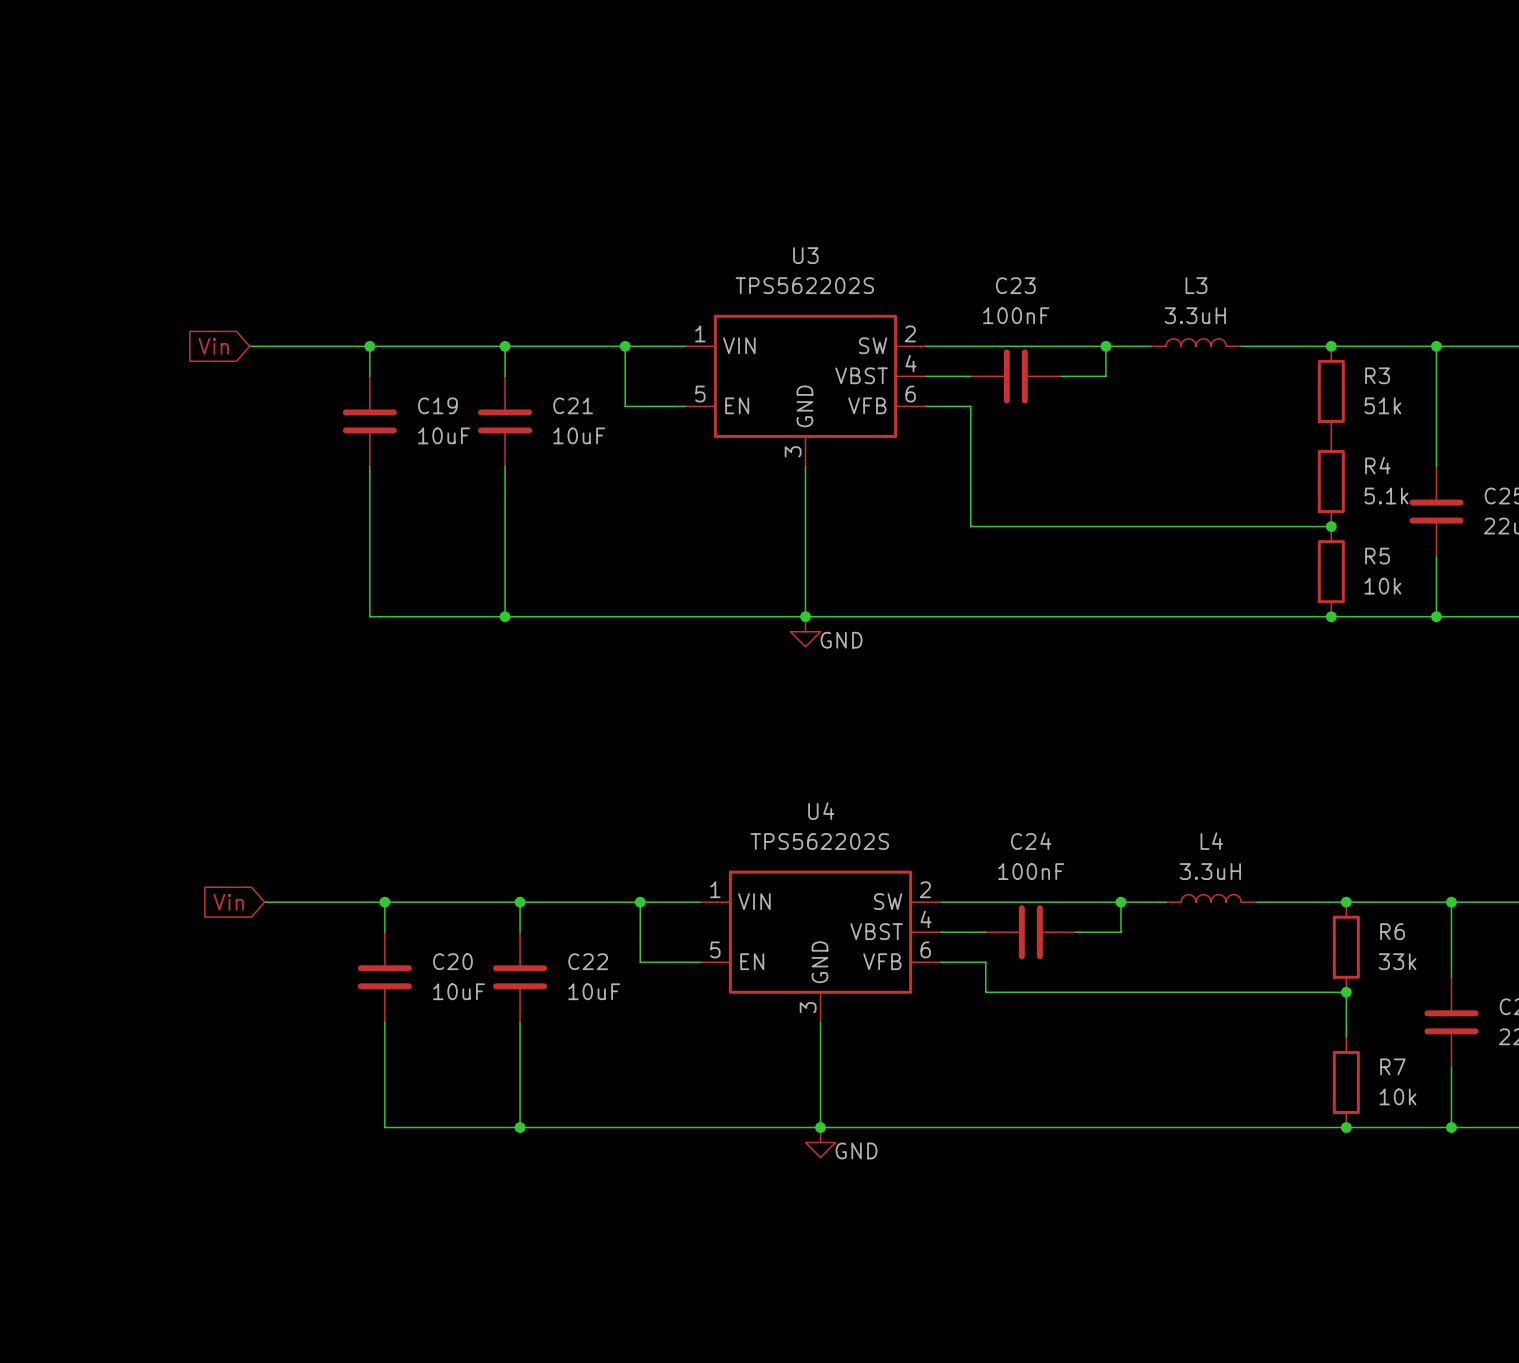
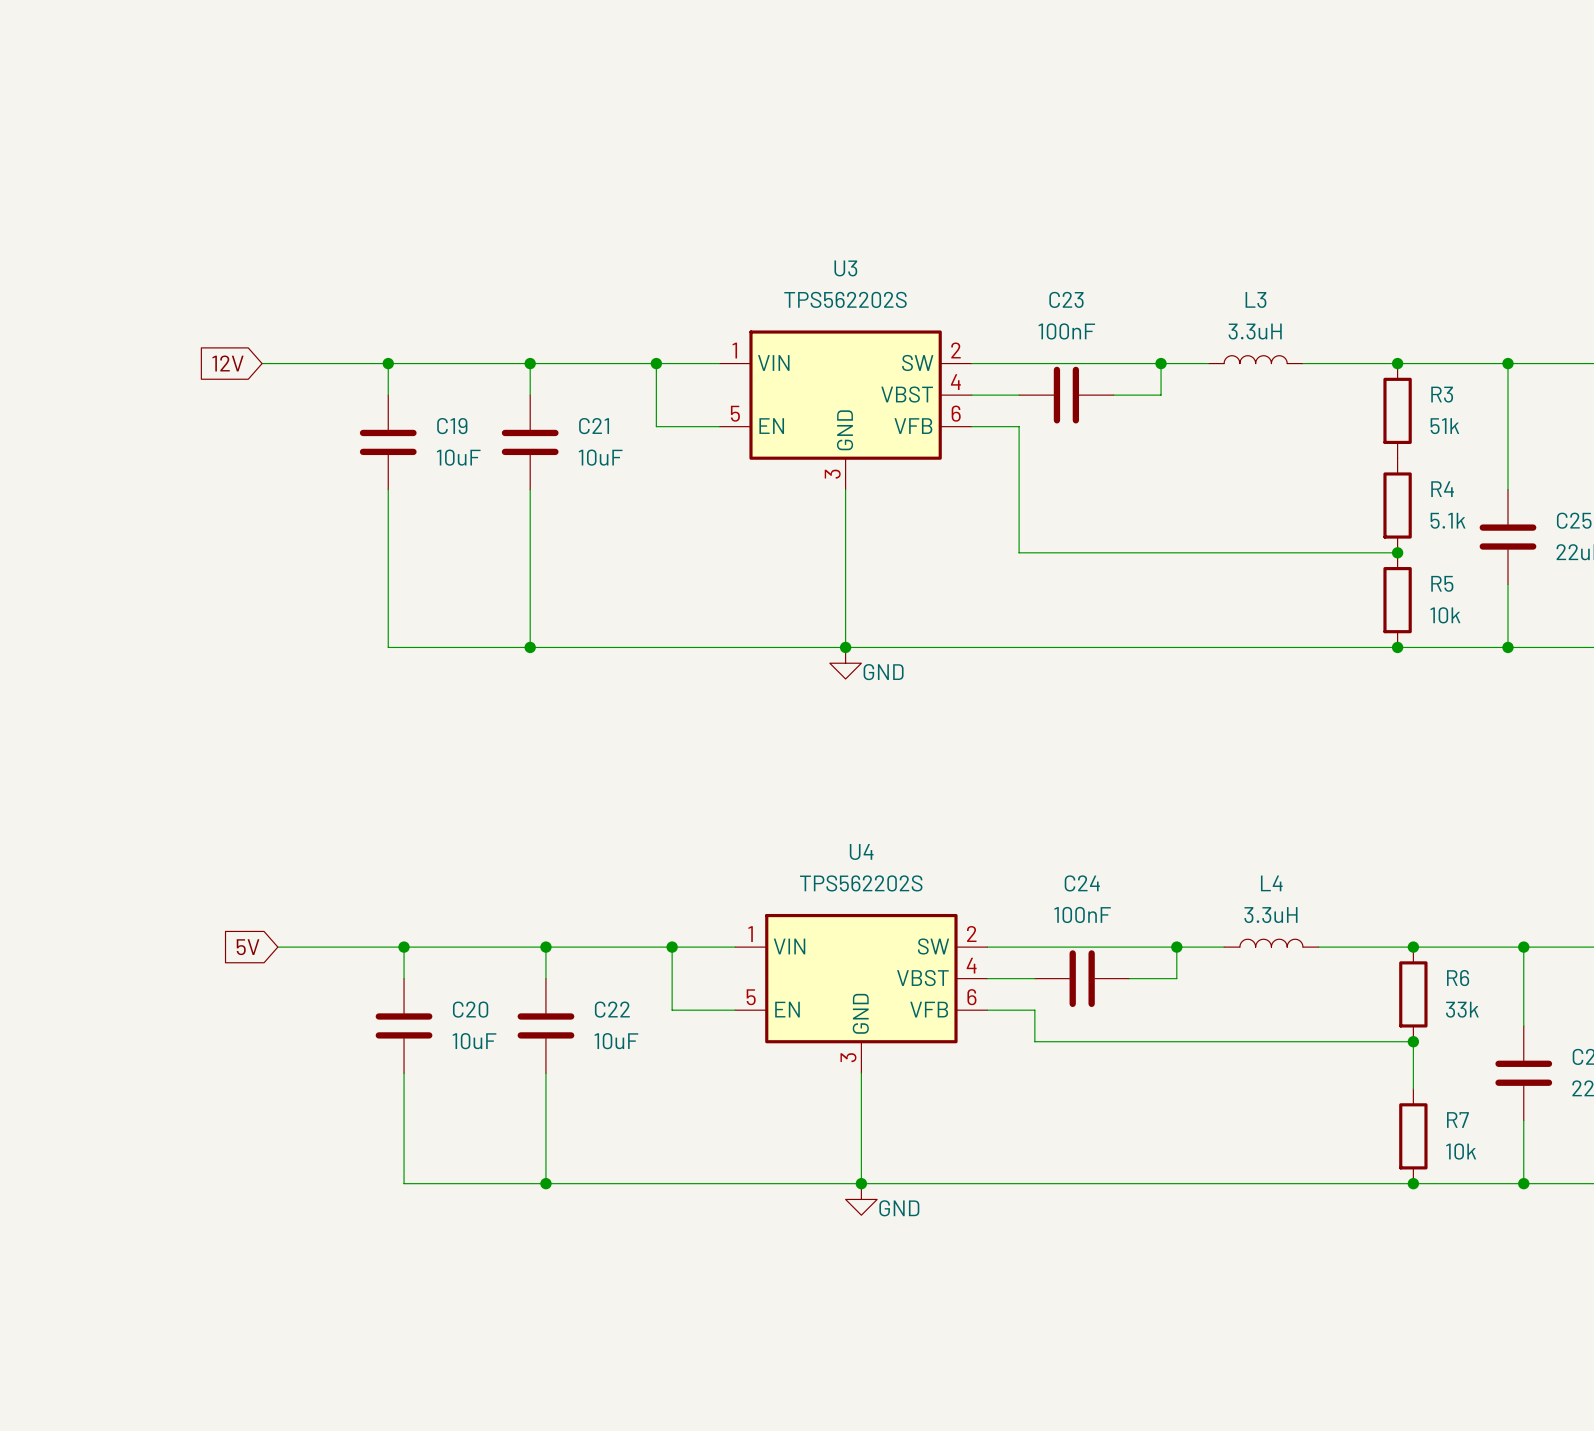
global label: Vin (213, 346) -> 12V (228, 363)
global label: Vin (228, 902) -> 5V (248, 947)

